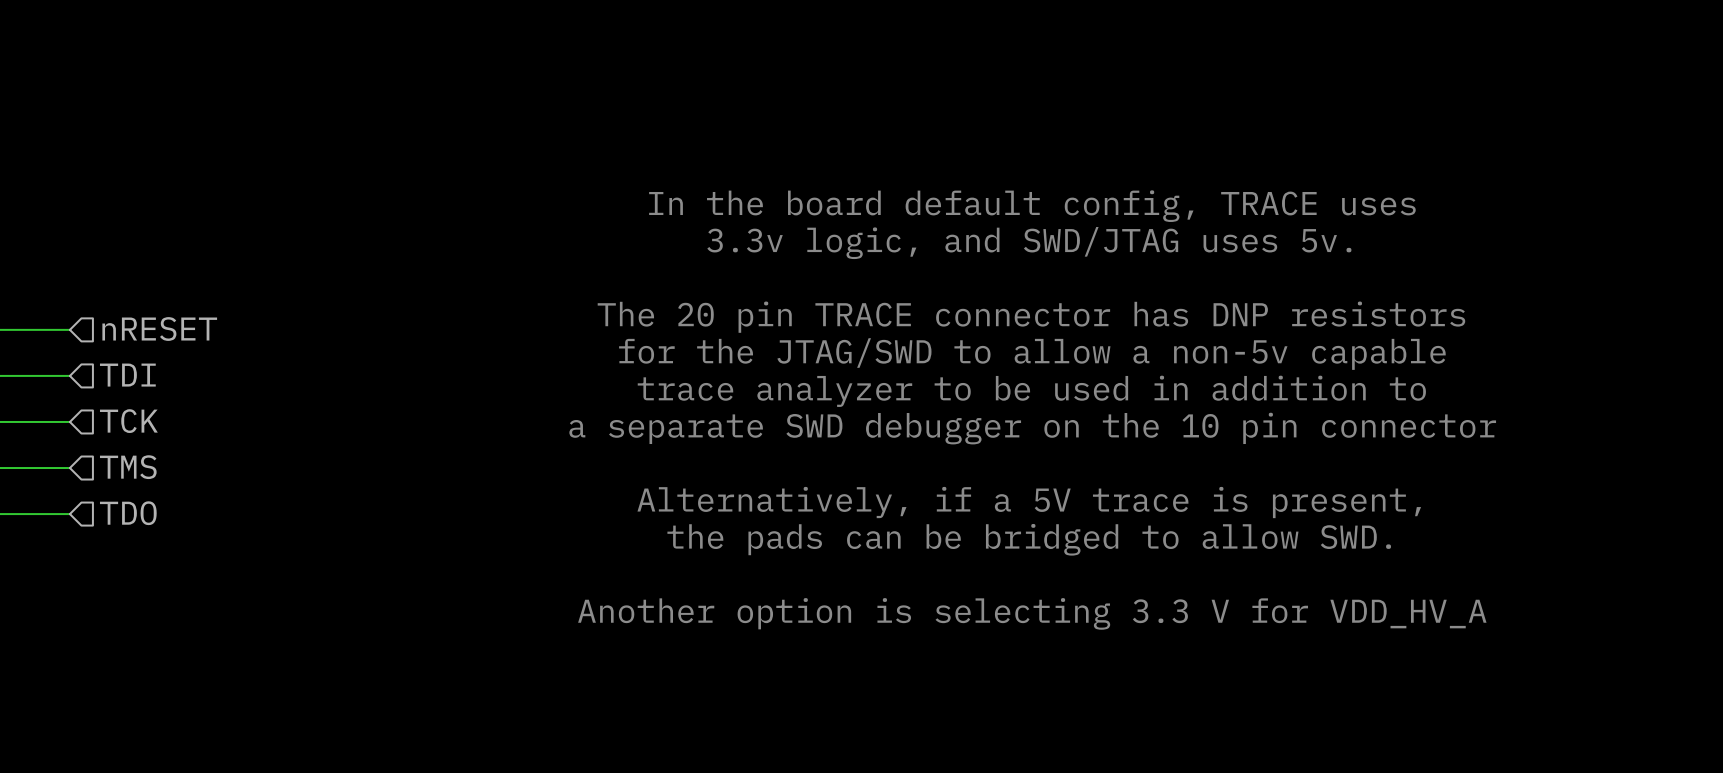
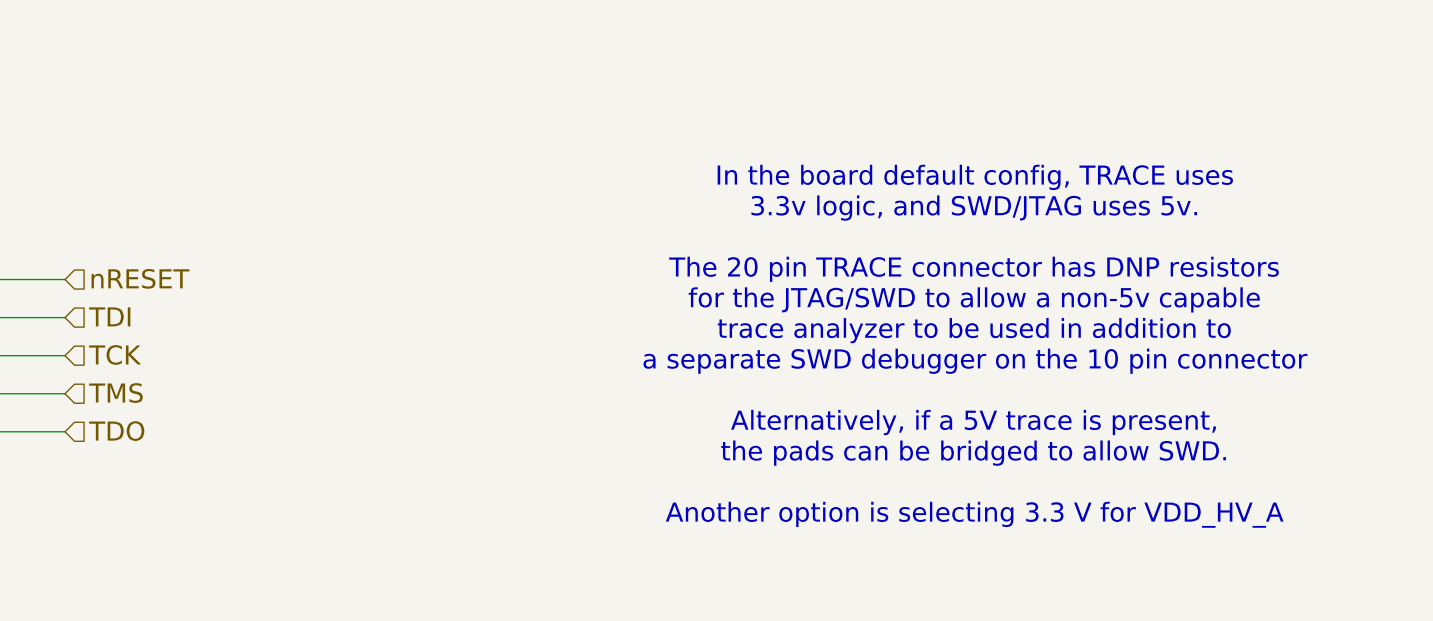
text position: In the board default config, TRACE uses (1032, 206) -> In the board default config, TRACE uses (975, 177)
text position: 3.3v logic, and SWD/JTAG uses 5v. (1029, 243) -> 3.3v logic, and SWD/JTAG uses 5v. (974, 208)
text position: The 20 pin TRACE connector has DNP resistors (1031, 317) -> The 20 pin TRACE connector has DNP resistors (973, 269)
text position: for the JTAG/SWD to allow a non-5v capable (1032, 354) -> for the JTAG/SWD to allow a non-5v capable (974, 299)
text position: trace analyzer to be used in addition to (1031, 391) -> trace analyzer to be used in addition to (974, 330)
text position: a separate SWD debugger on the 10 pin connector (1032, 428) -> a separate SWD debugger on the 10 pin connector (975, 361)
text position: Alternatively, if a 5V trace is present, (1029, 502) -> Alternatively, if a 5V trace is present, (973, 422)
text position: the pads can be bridged to allow SWD. (1029, 539) -> the pads can be bridged to allow SWD. (973, 453)
text position: Another option is selecting 3.3 V for VDD_HV_A (1032, 613) -> Another option is selecting 3.3 V for VDD_HV_A (974, 514)

